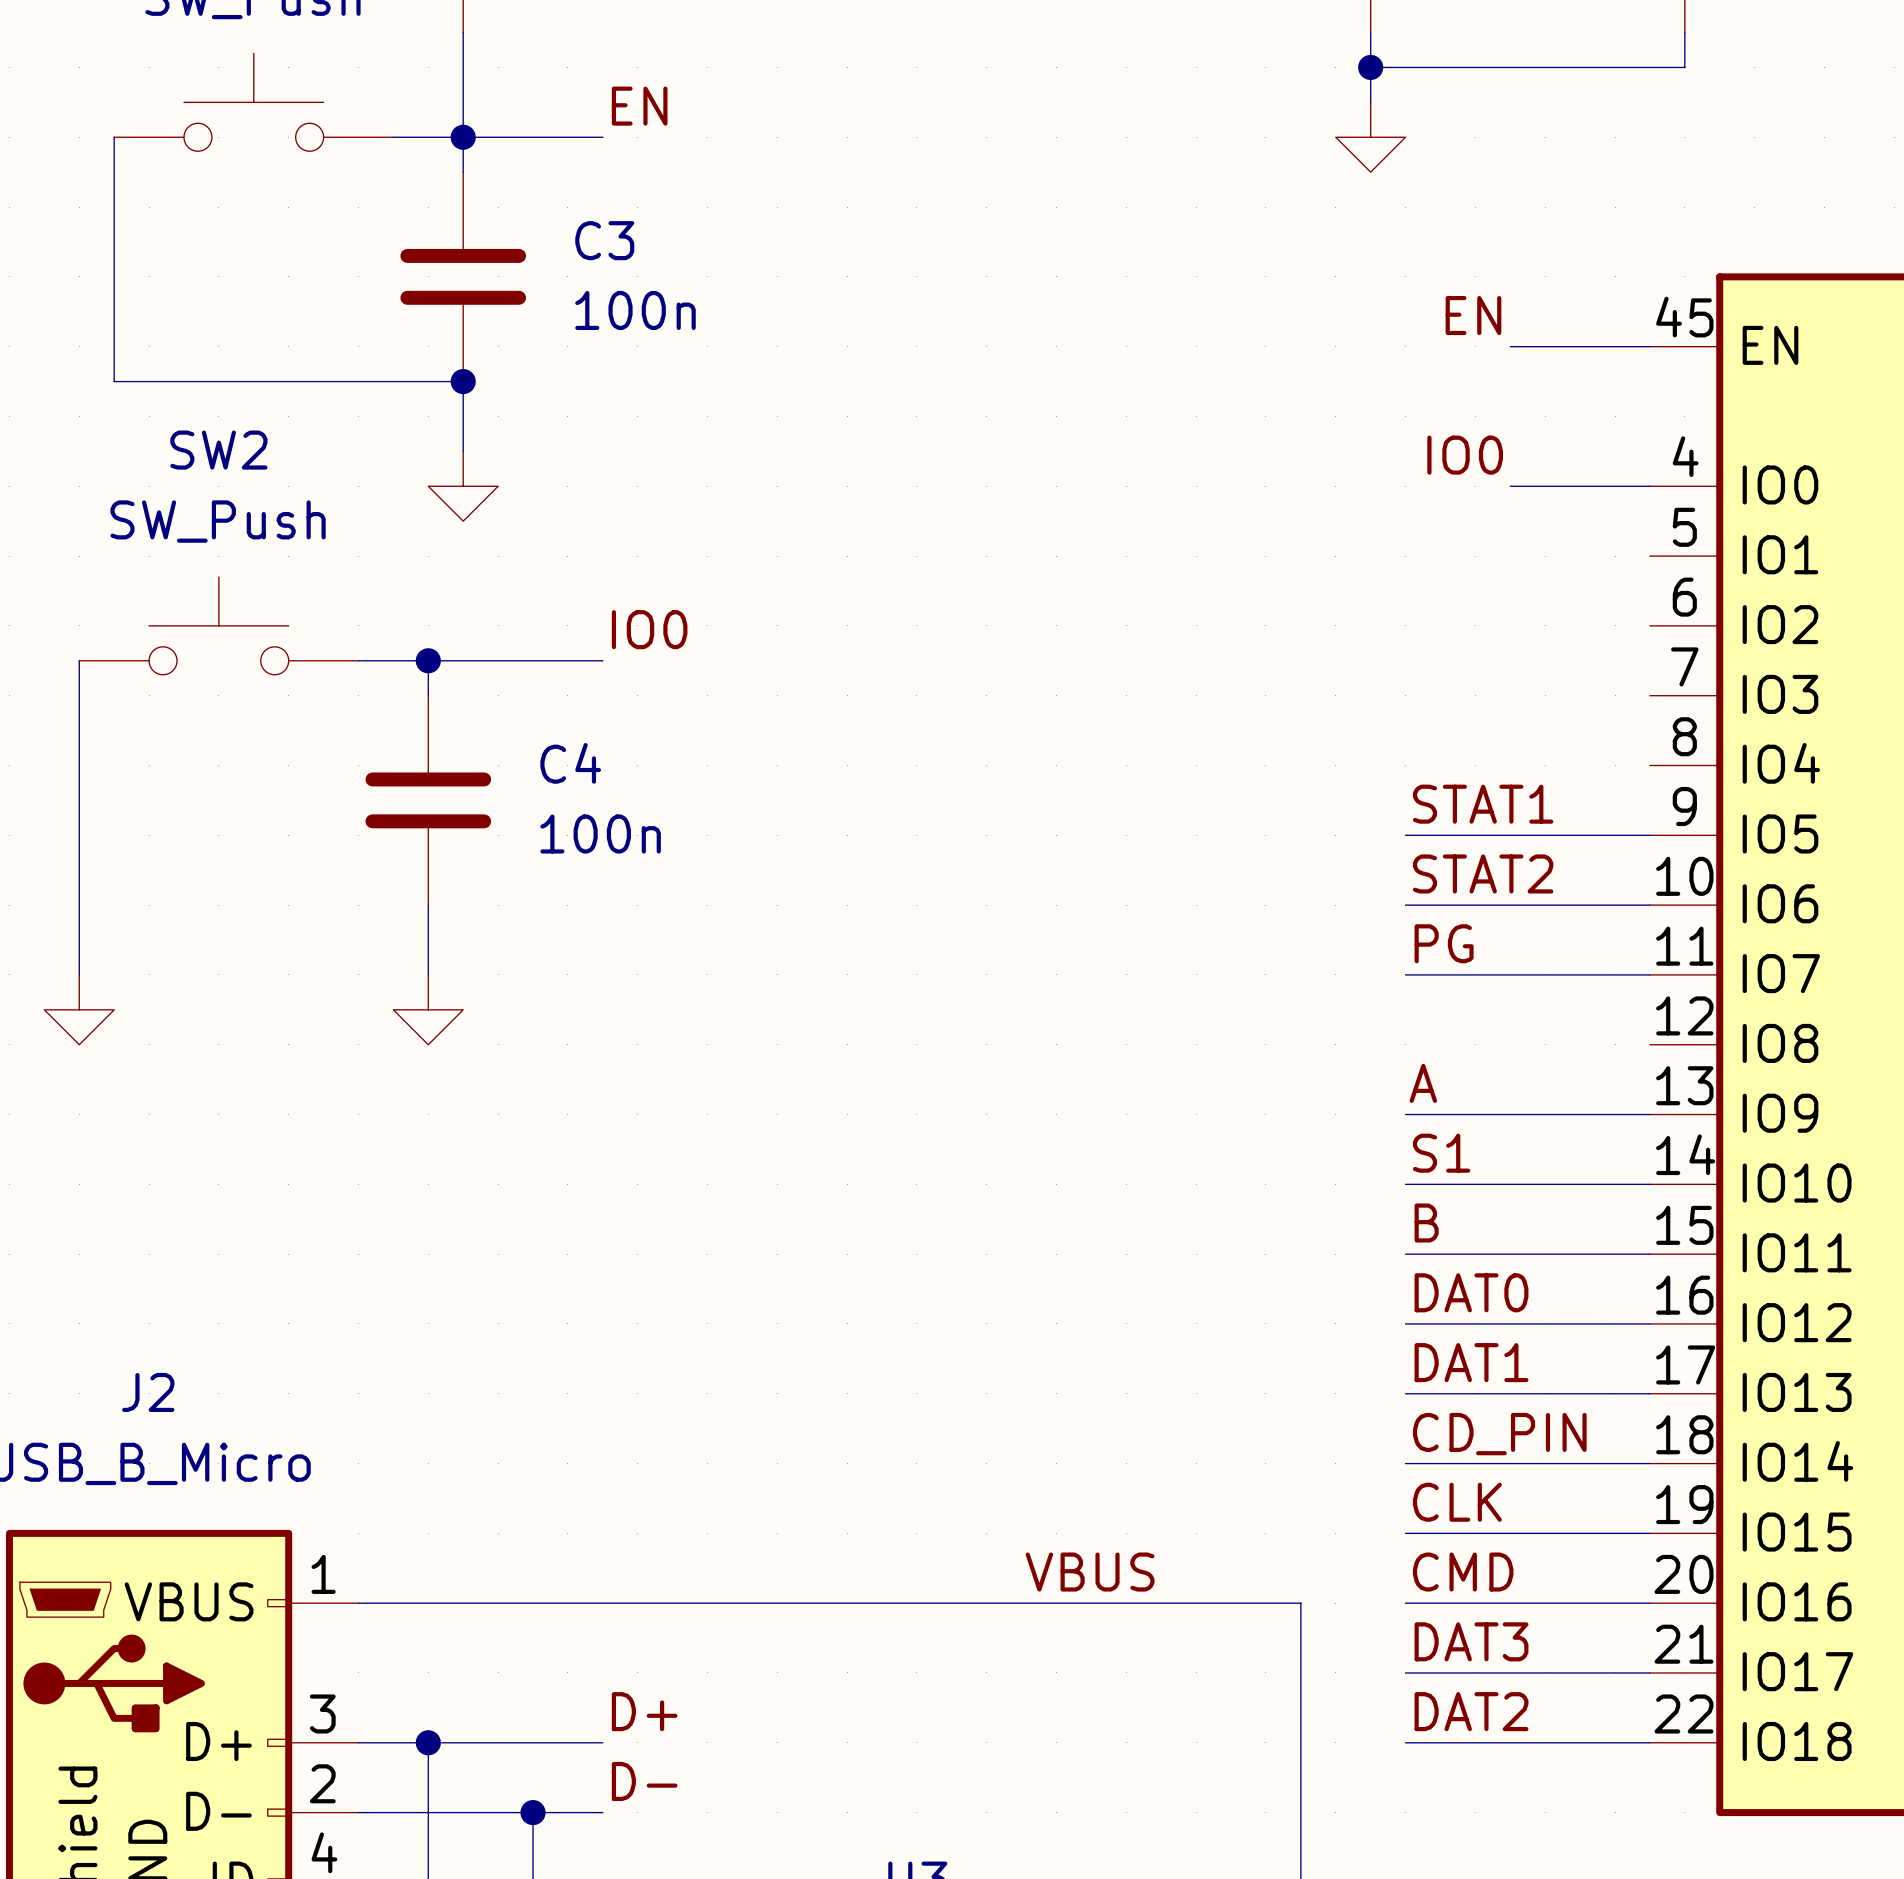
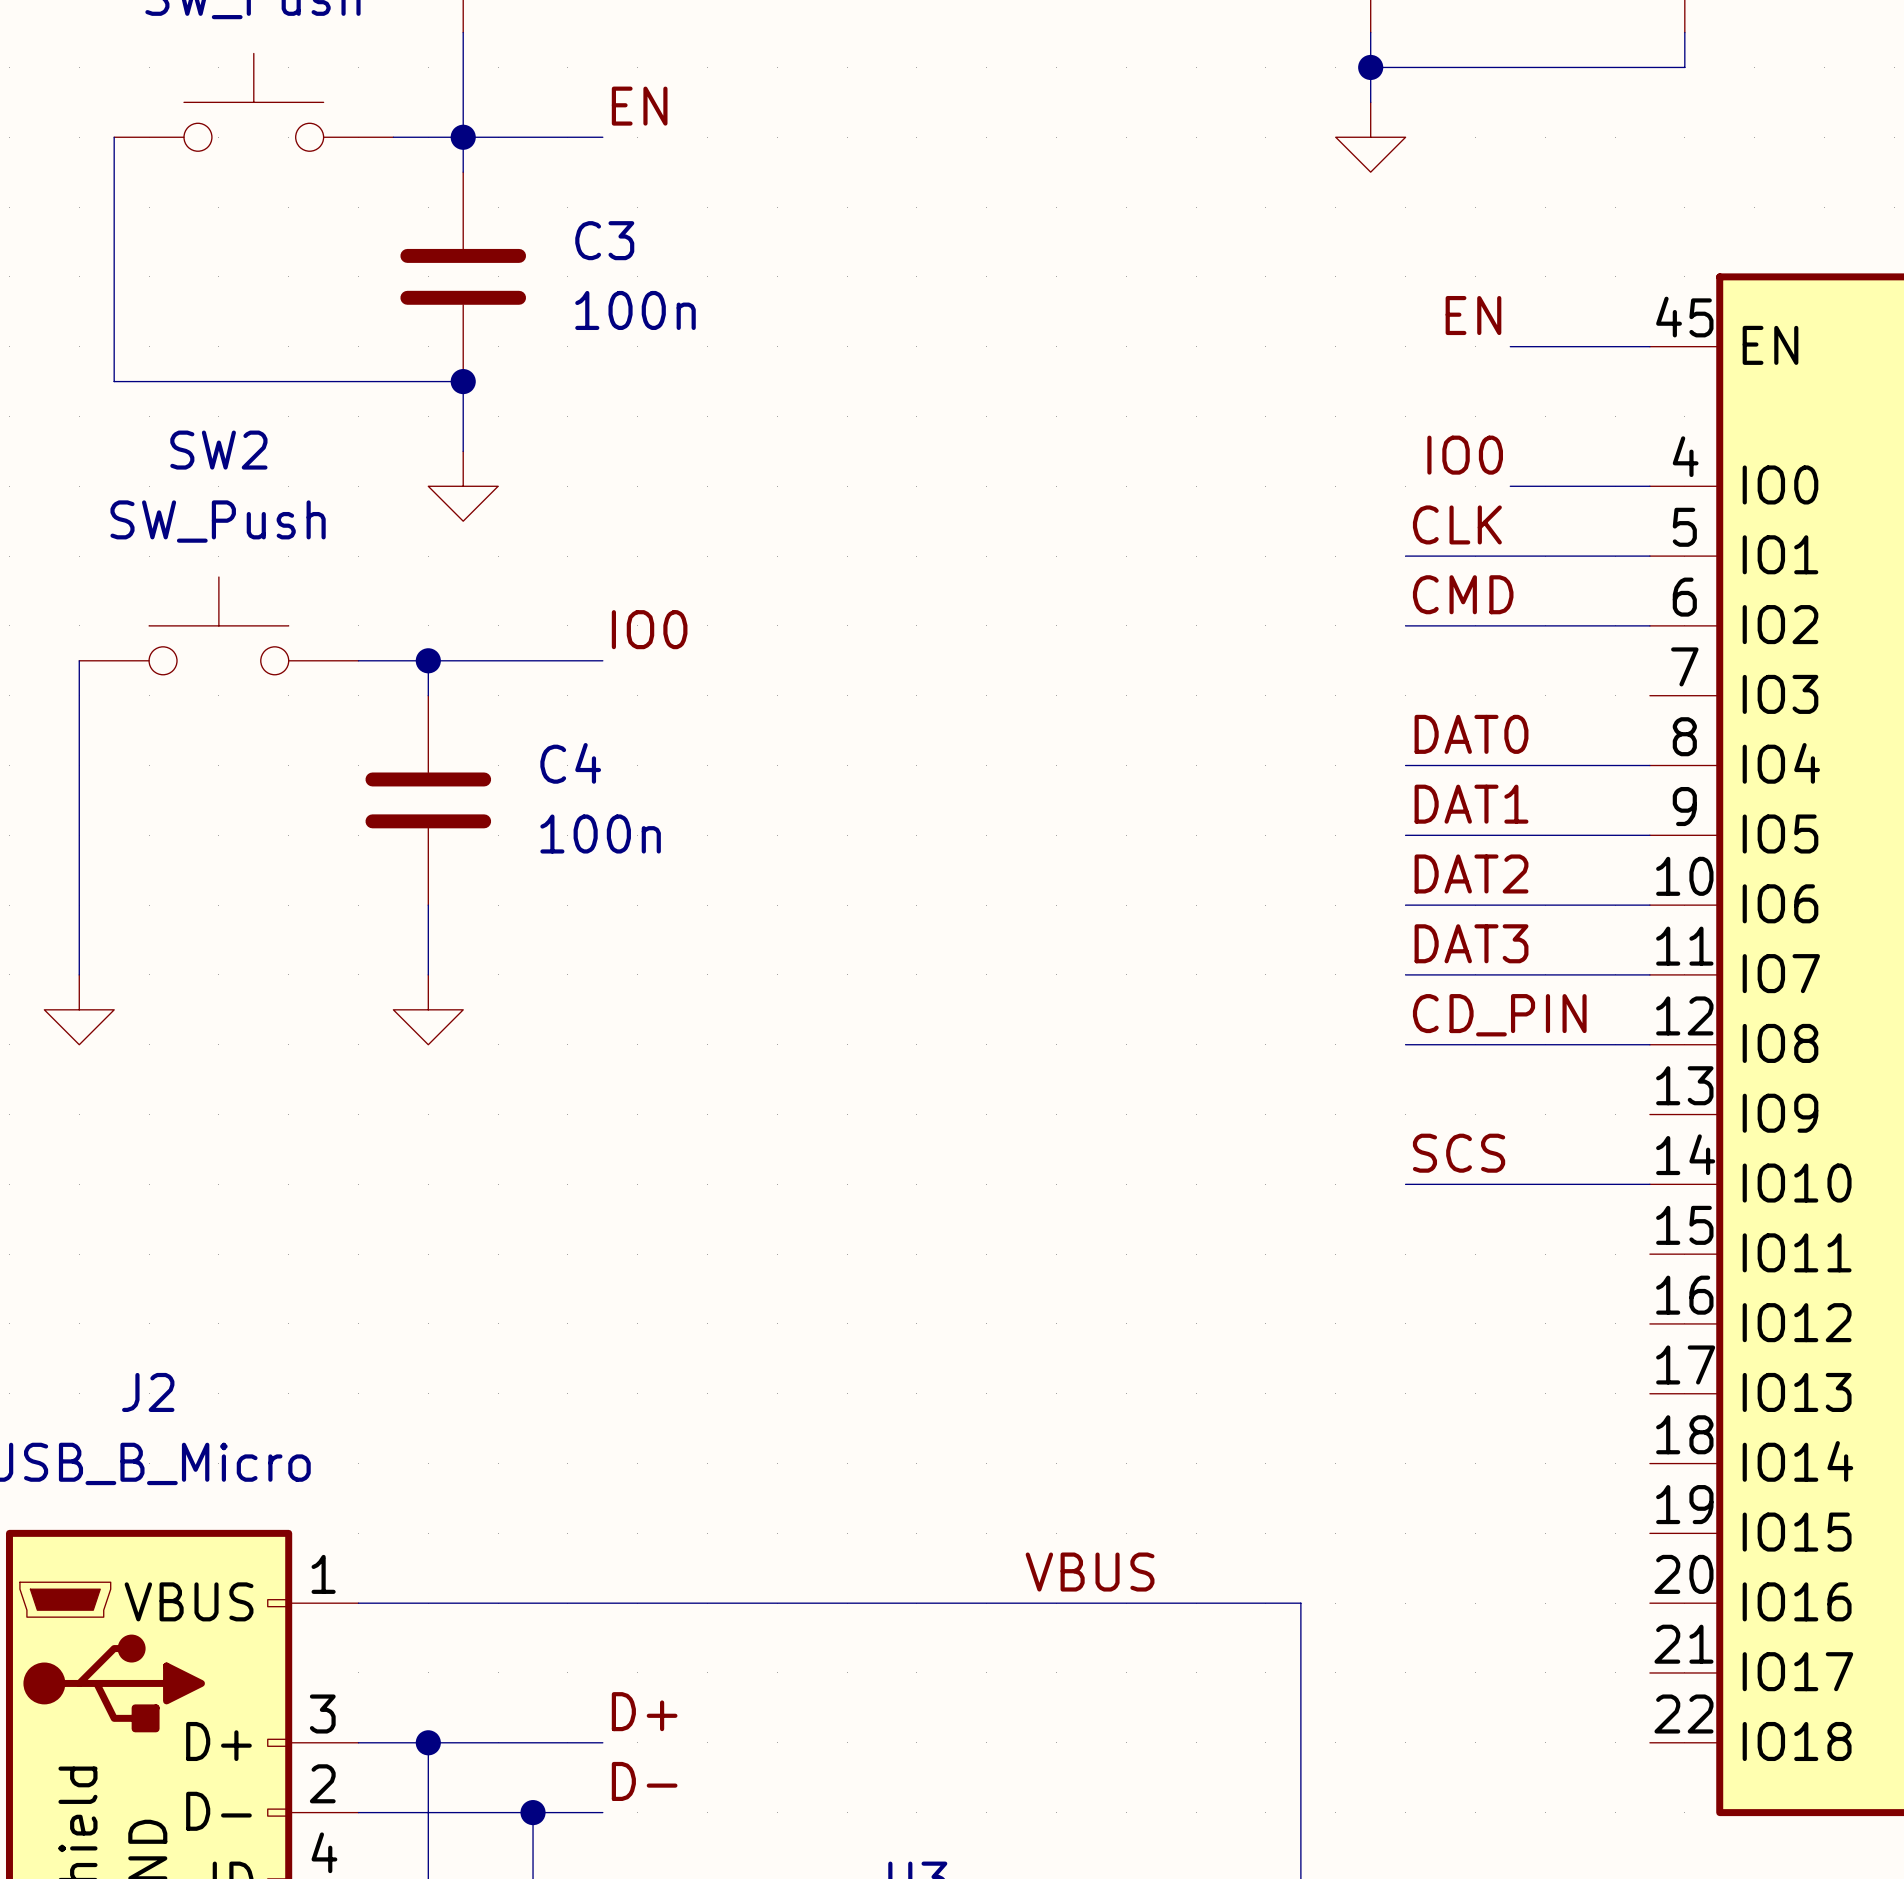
label: none -> CLK (1457, 524)
wire: none -> (1405, 556) (1649, 556)
label: none -> CMD (1463, 594)
label: STAT1 (1483, 804) -> DAT1 (1471, 804)
label: STAT2 (1483, 873) -> DAT2 (1471, 873)
label: PG (1444, 943) -> DAT3 (1471, 943)
label: A (1423, 1083) -> none
wire: (1405, 1114) (1649, 1114) -> (1405, 625) (1649, 625)
label: S1 (1441, 1153) -> SCS (1459, 1153)
label: B (1426, 1223) -> none
wire: (1405, 1254) (1649, 1254) -> (1405, 765) (1649, 765)
label position: DAT0 (1471, 1292) -> DAT0 (1471, 734)
wire: (1405, 1323) (1649, 1323) -> none
label: DAT1 (1471, 1362) -> none
wire: (1405, 1393) (1649, 1393) -> none
label position: CD_PIN (1499, 1434) -> CD_PIN (1499, 1015)
wire: (1405, 1463) (1649, 1463) -> none
label: CLK (1457, 1502) -> none
wire: (1405, 1533) (1649, 1533) -> (1405, 1044) (1649, 1044)
label: CMD (1463, 1572) -> none
wire: (1405, 1603) (1649, 1603) -> none
label: DAT3 (1471, 1641) -> none
wire: (1405, 1672) (1649, 1672) -> none
label: DAT2 (1471, 1711) -> none
wire: (1405, 1742) (1649, 1742) -> none

